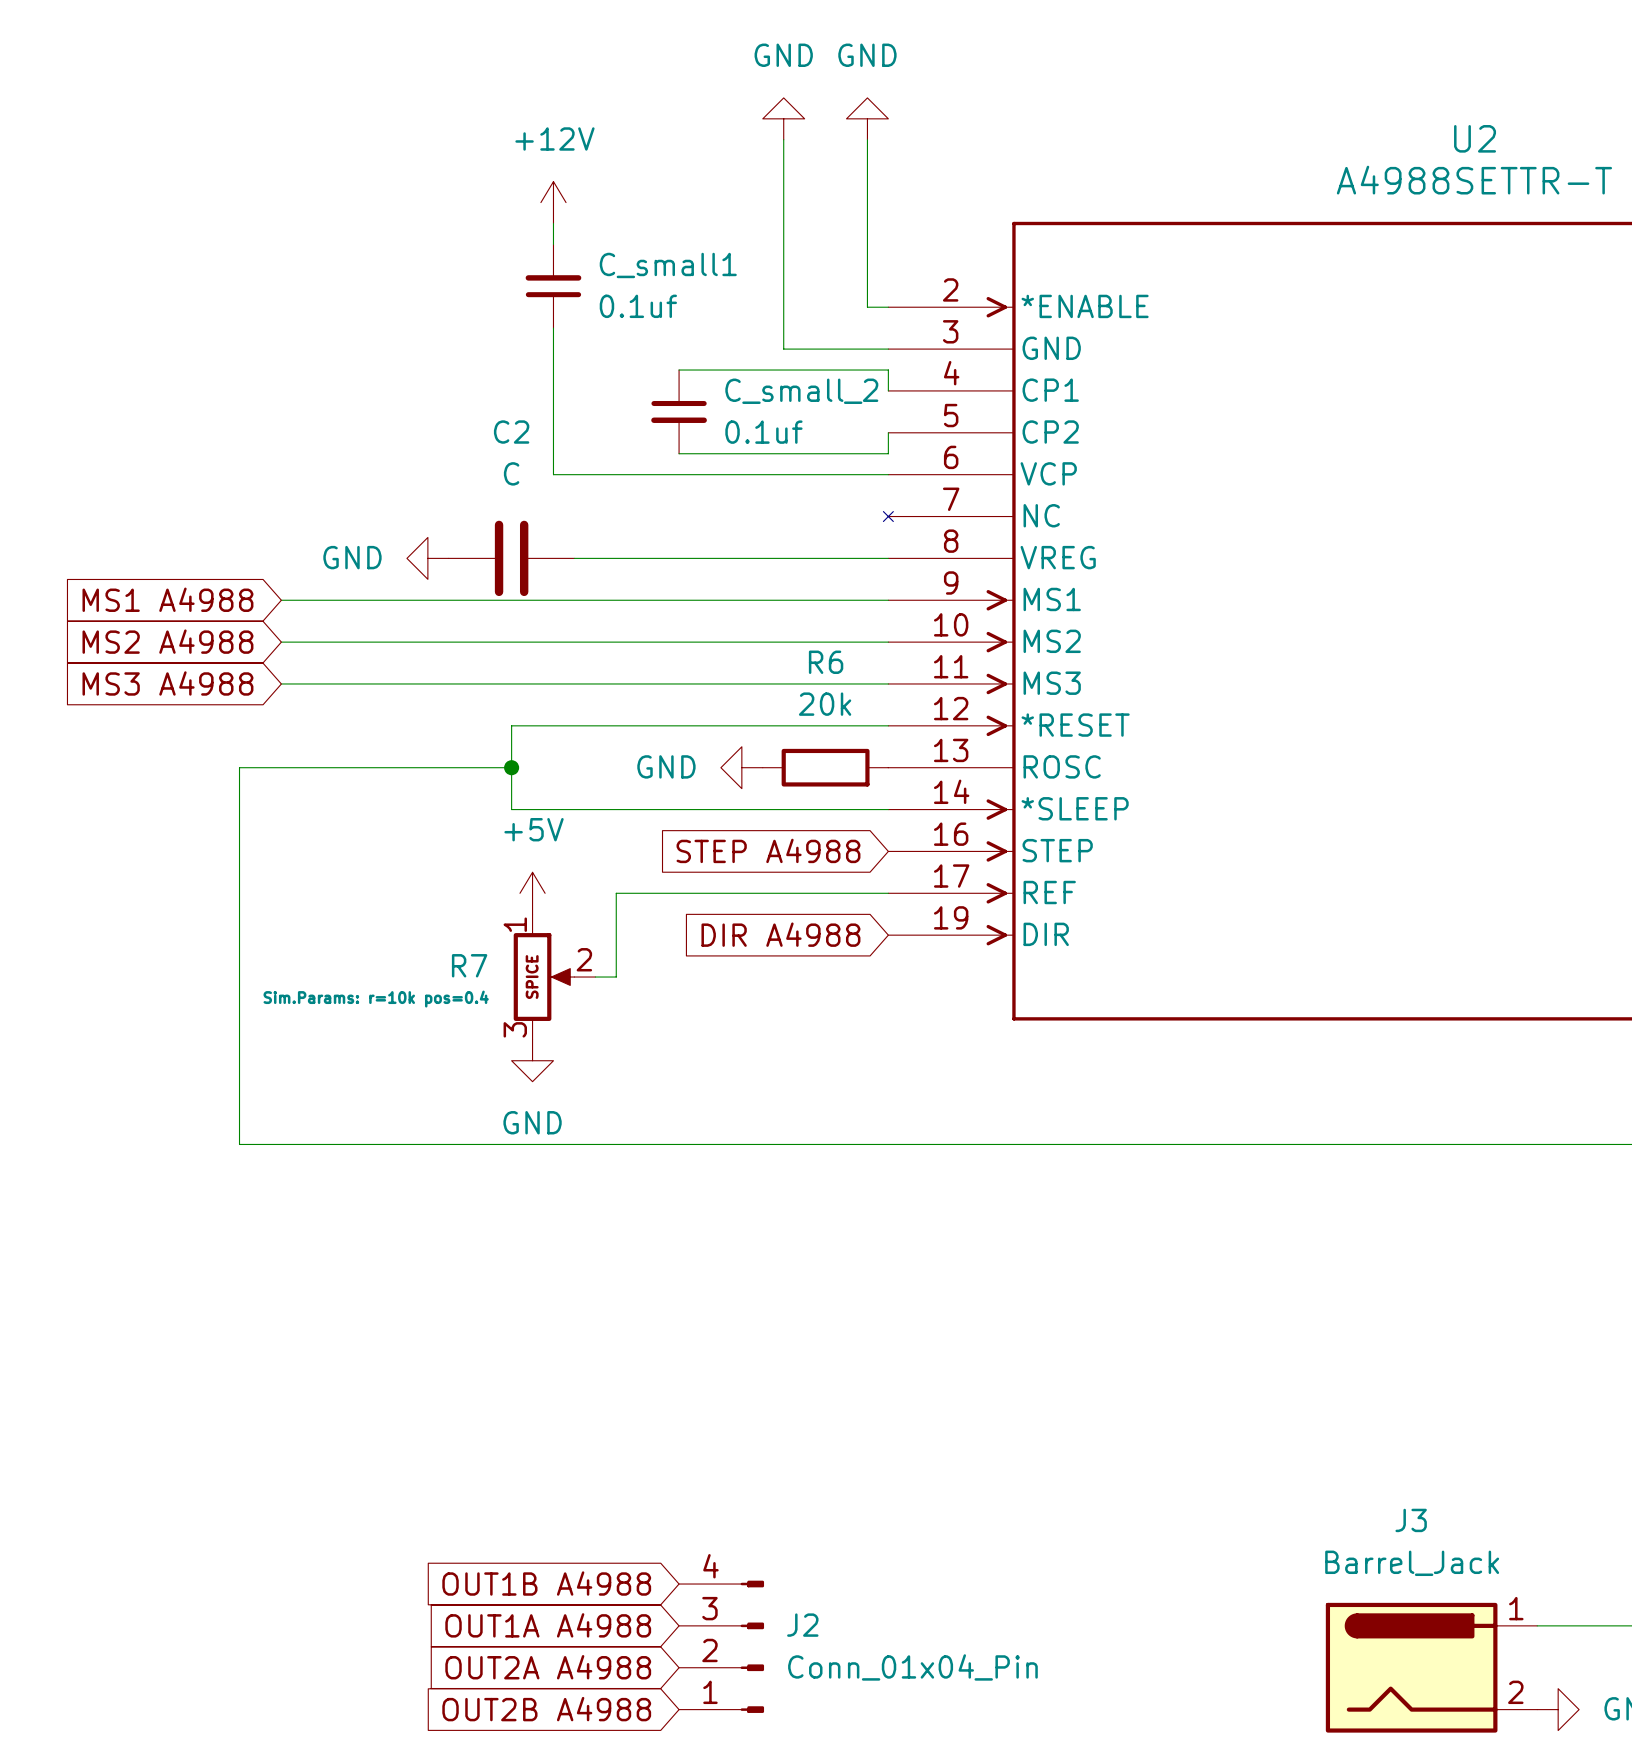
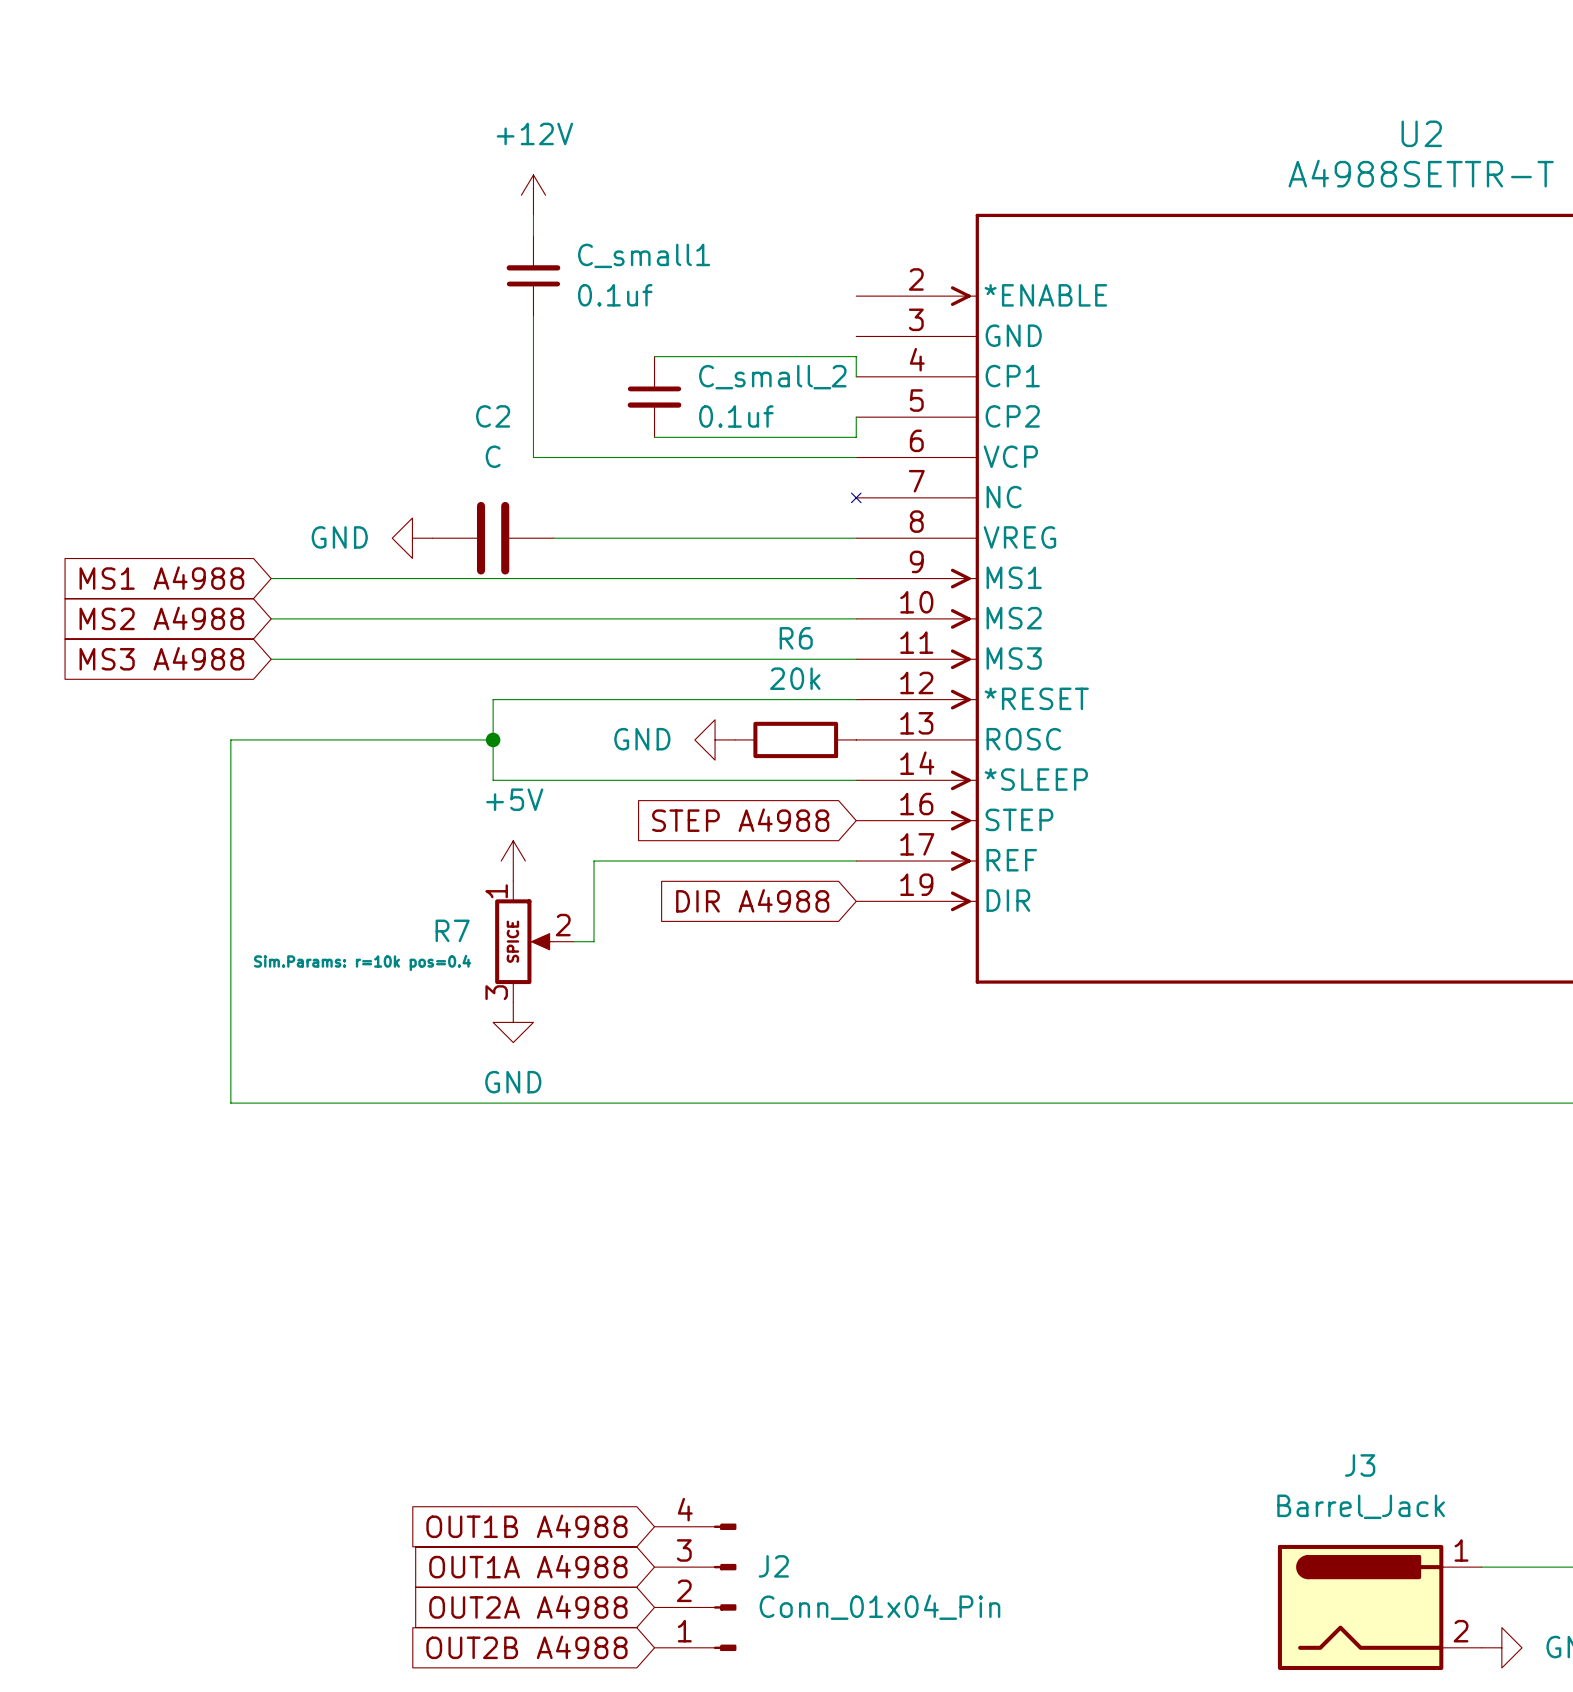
power symbol: GND (783, 118) -> none
power symbol: GND (867, 118) -> none
wire: (783, 139) (783, 349) (888, 349) -> none
wire: (867, 139) (867, 307) (888, 307) -> none

